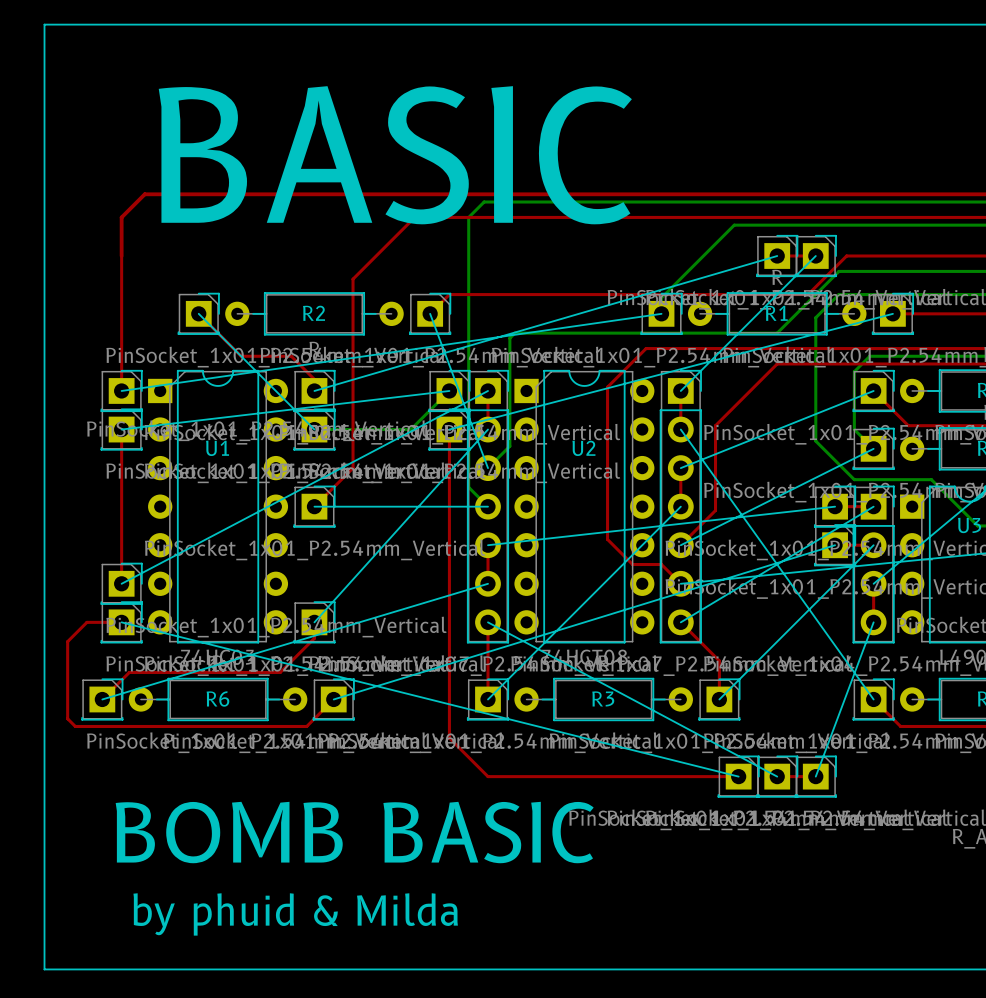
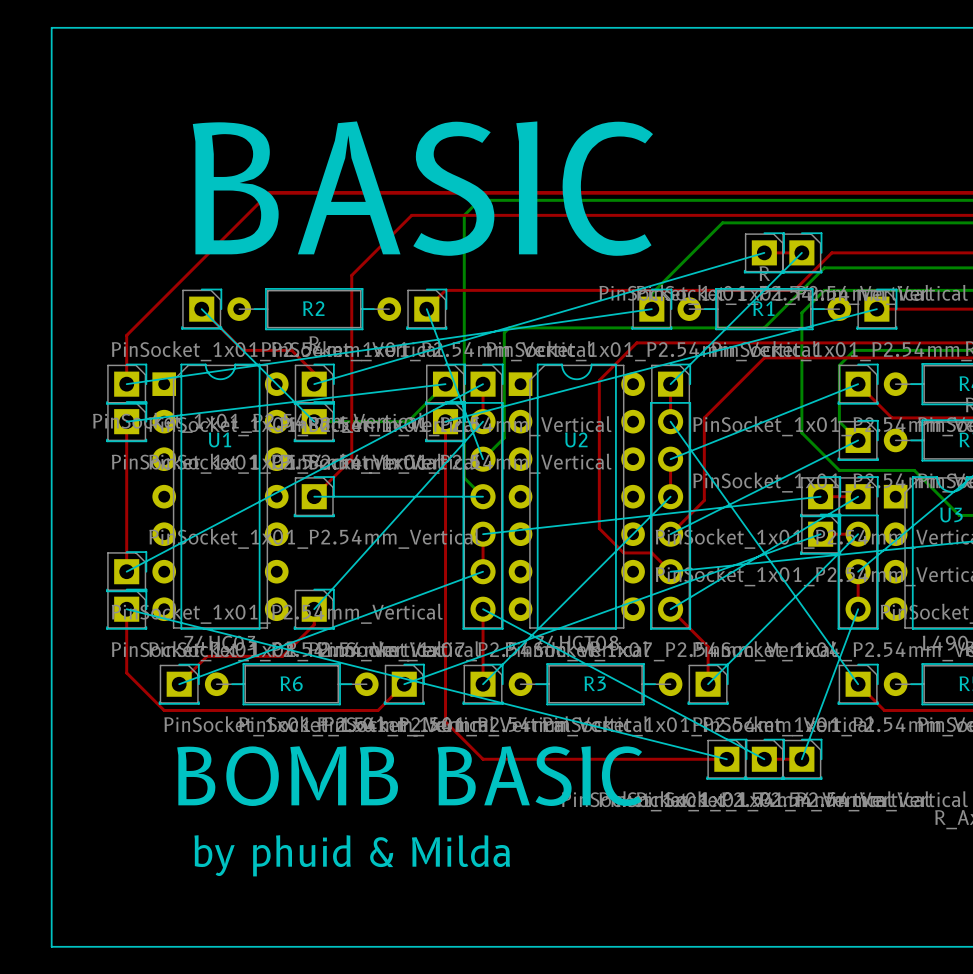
text position: BASIC (395, 155) -> BASIC (422, 188)
top track: (268, 194) (144, 194) (121, 217) (121, 340) -> (269, 192) (126, 335)
line: (835, 545) (333, 699) -> (820, 534) (404, 684)
line: (487, 583) (102, 699) -> (483, 571) (179, 684)
top track: (121, 622) (86, 622) (67, 641) (67, 718) (75, 726) (160, 726) -> (126, 609) (126, 672) (164, 710)
top track: (281, 670) (280, 672) (129, 672) (102, 699) -> (282, 656) (207, 656) (179, 684)
part position: (102, 699) -> (179, 684)
R6 position: (218, 699) -> (291, 684)
top track: (333, 699) (306, 726) -> (404, 684) (378, 710) (306, 710)
part position: (333, 699) -> (404, 684)
text position: BOMB BASIC (354, 832) -> BOMB BASIC (409, 776)
text position: by phuid & Milda (295, 914) -> by phuid & Milda (352, 855)

